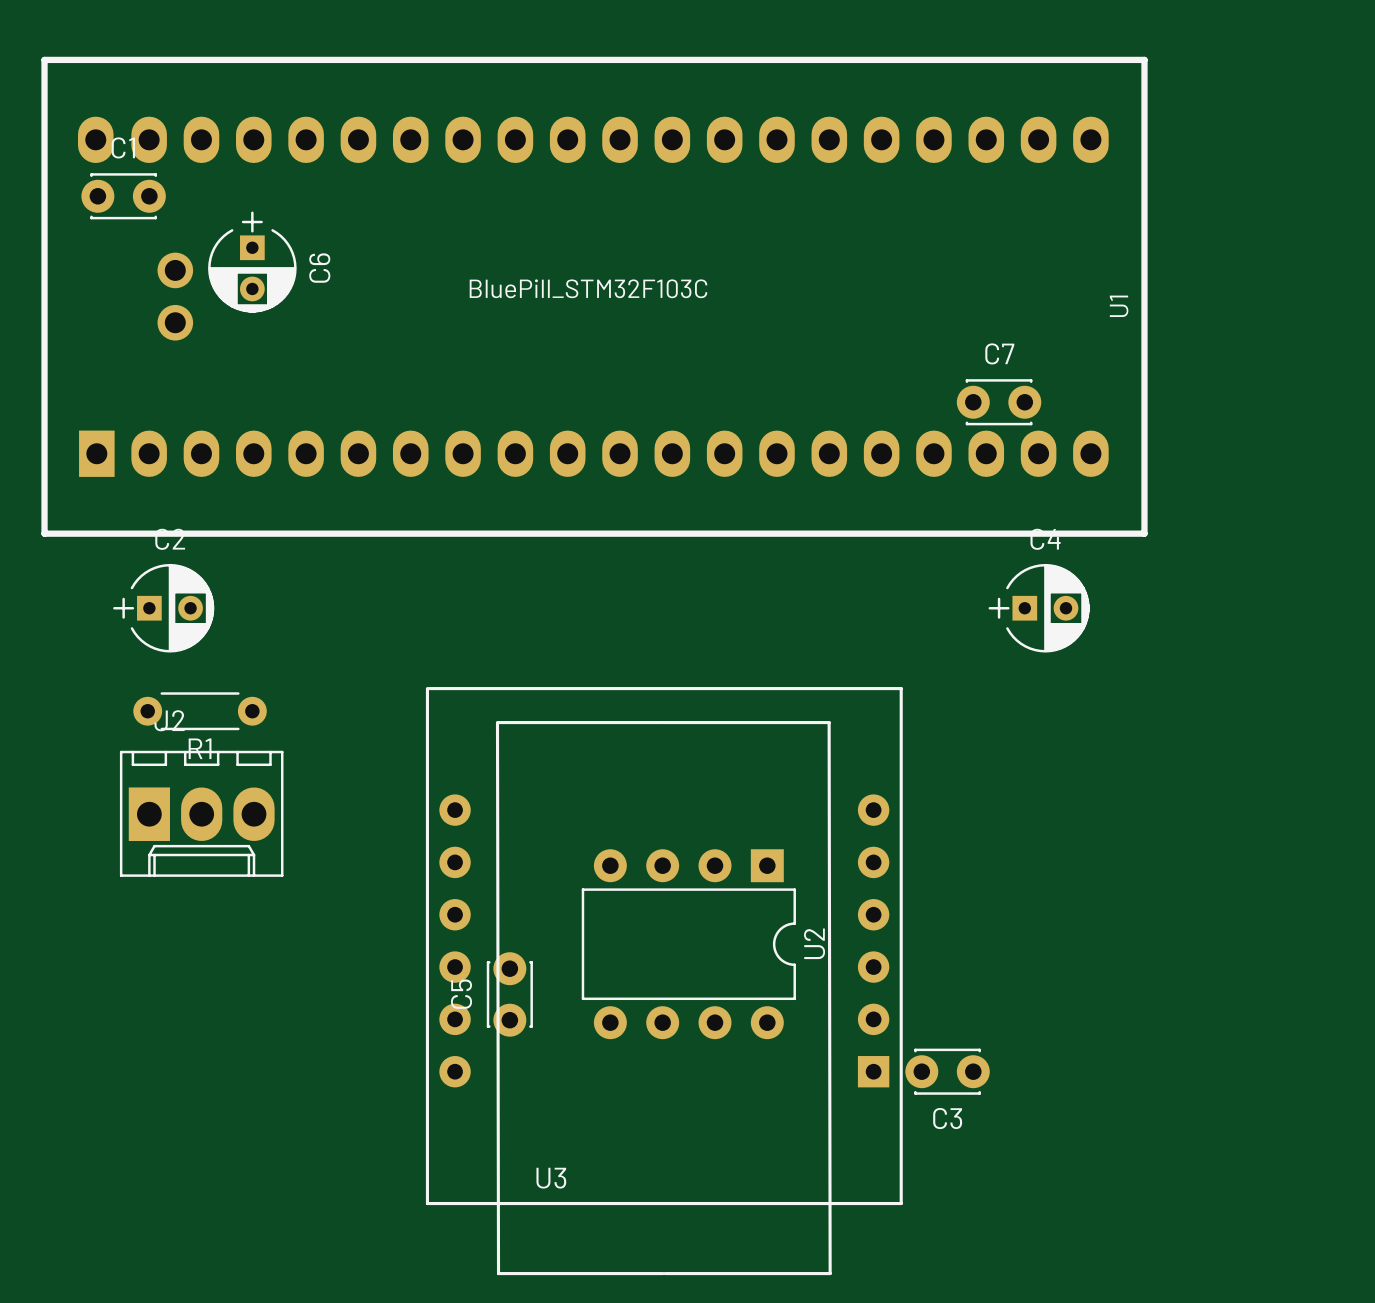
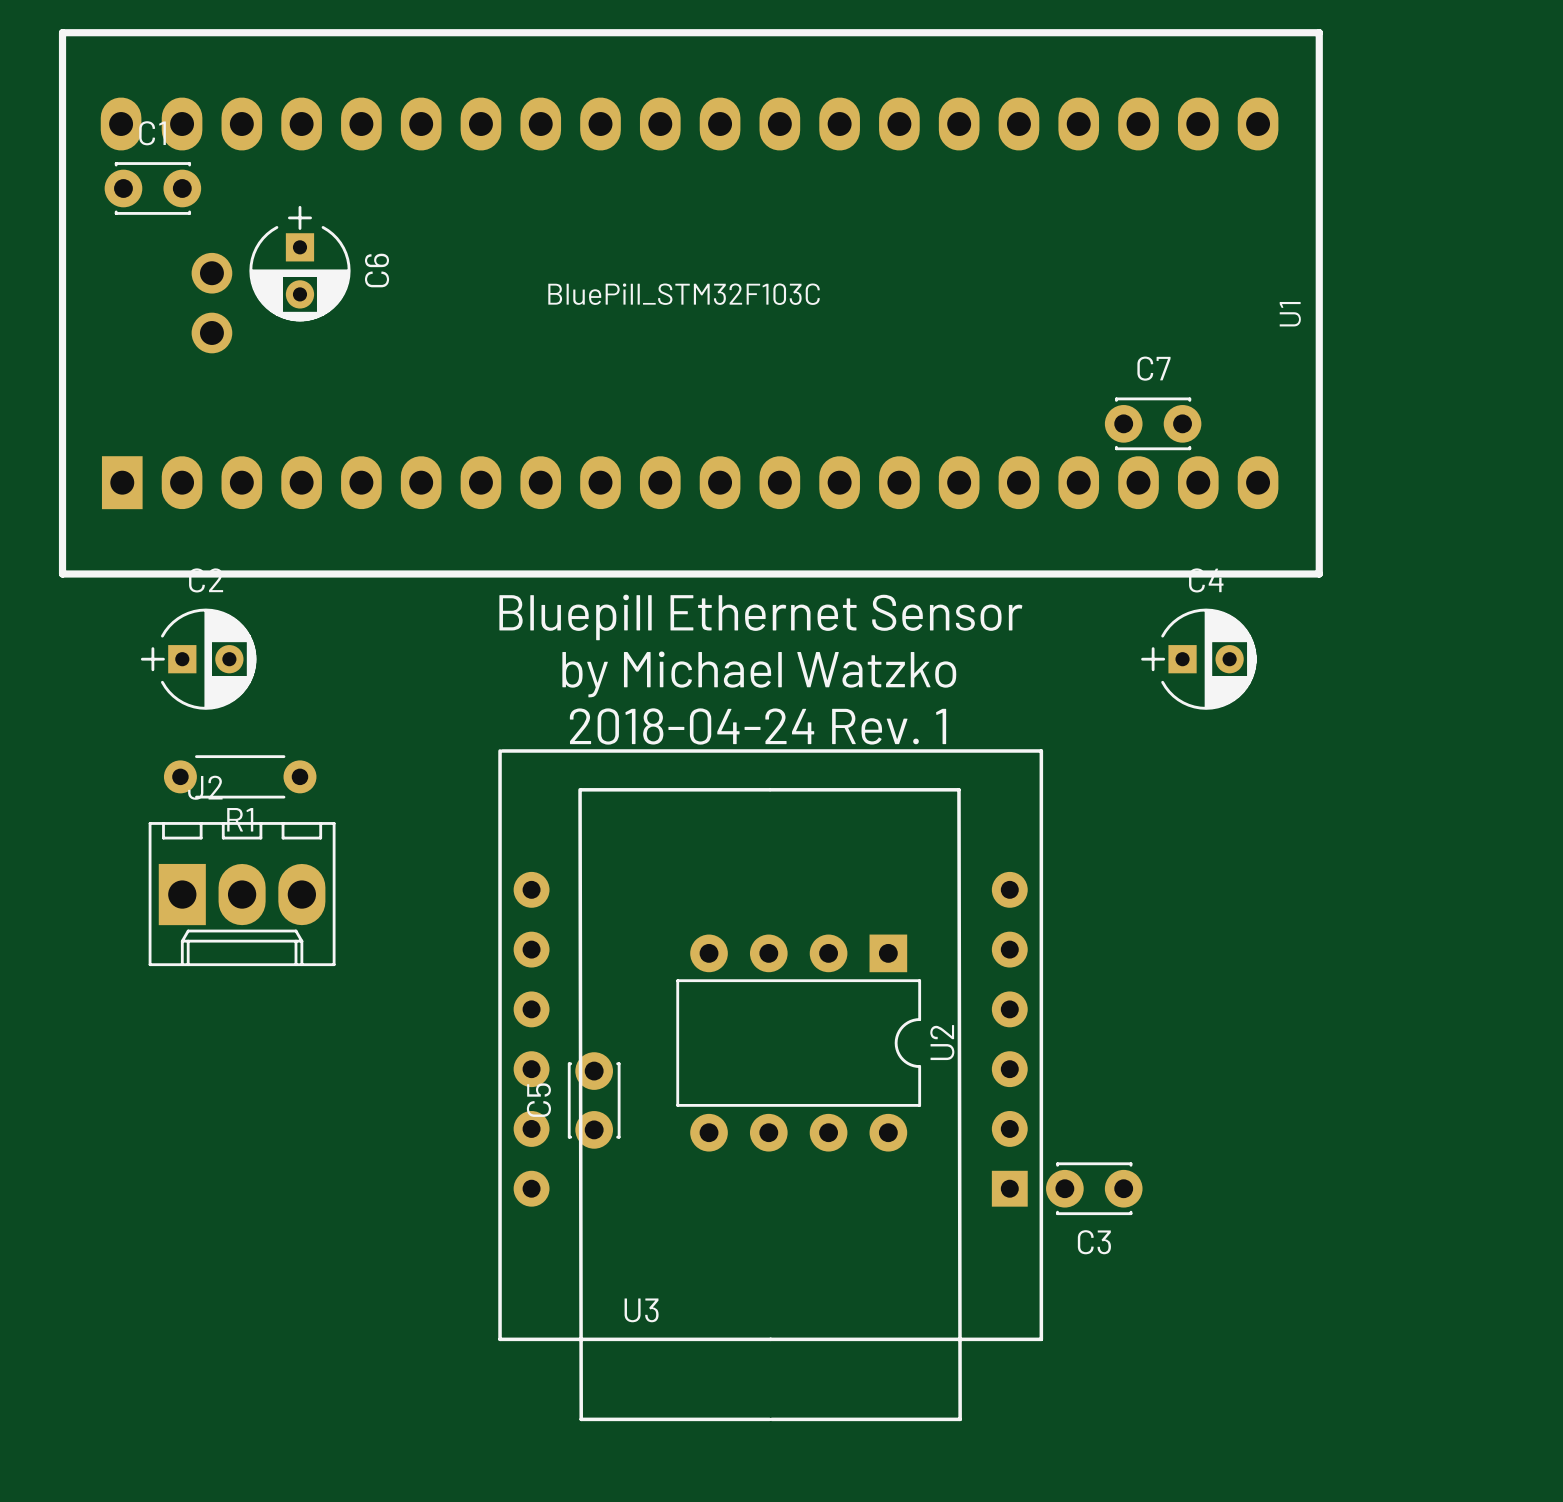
text: none -> Bluepill Ethernet Sensor (760, 617)
text: none -> by Michael Watzko (759, 674)
text: none -> 2018-04-24 Rev. 1 (758, 726)

